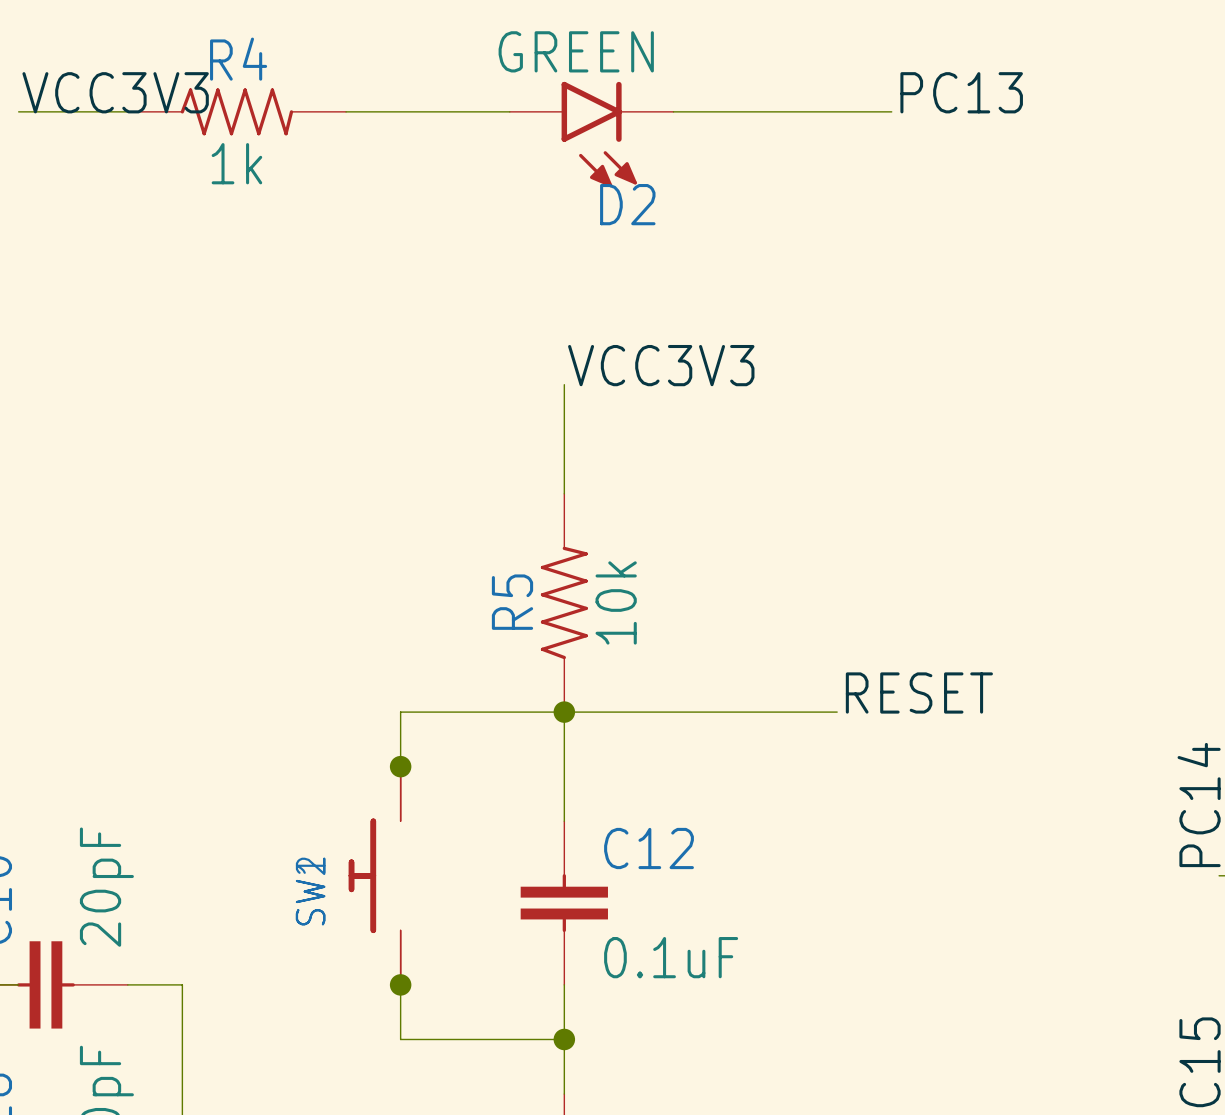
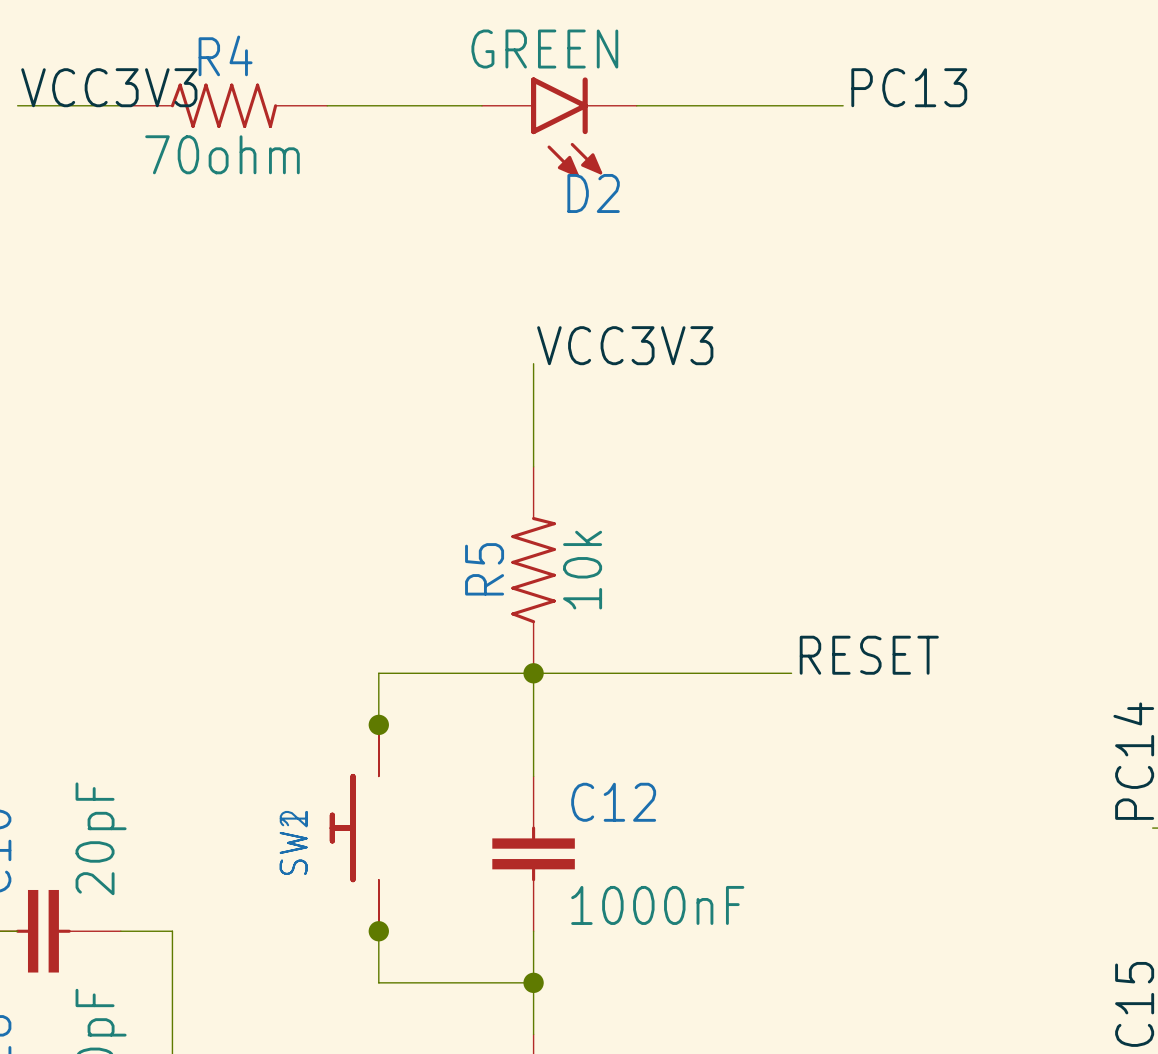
R4 value: 1k (236, 163) -> 70ohm (222, 154)
C12 value: 0.1uF (671, 957) -> 1000nF (657, 905)

